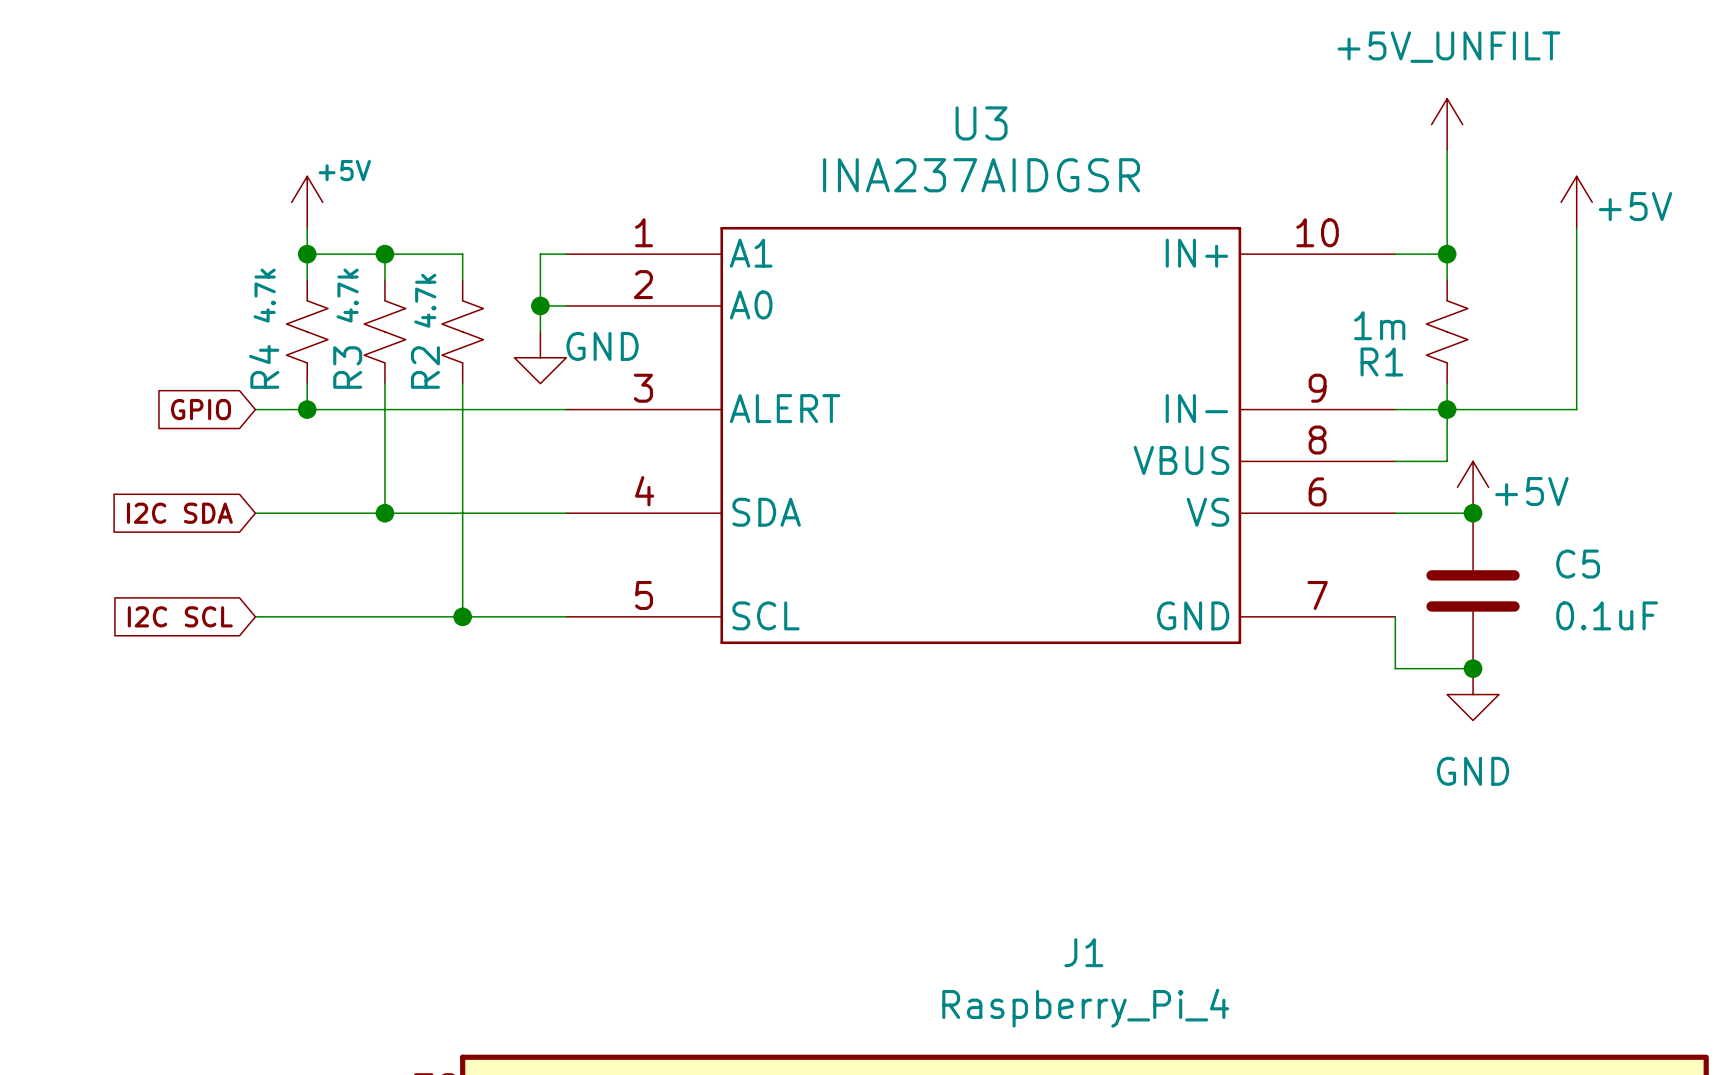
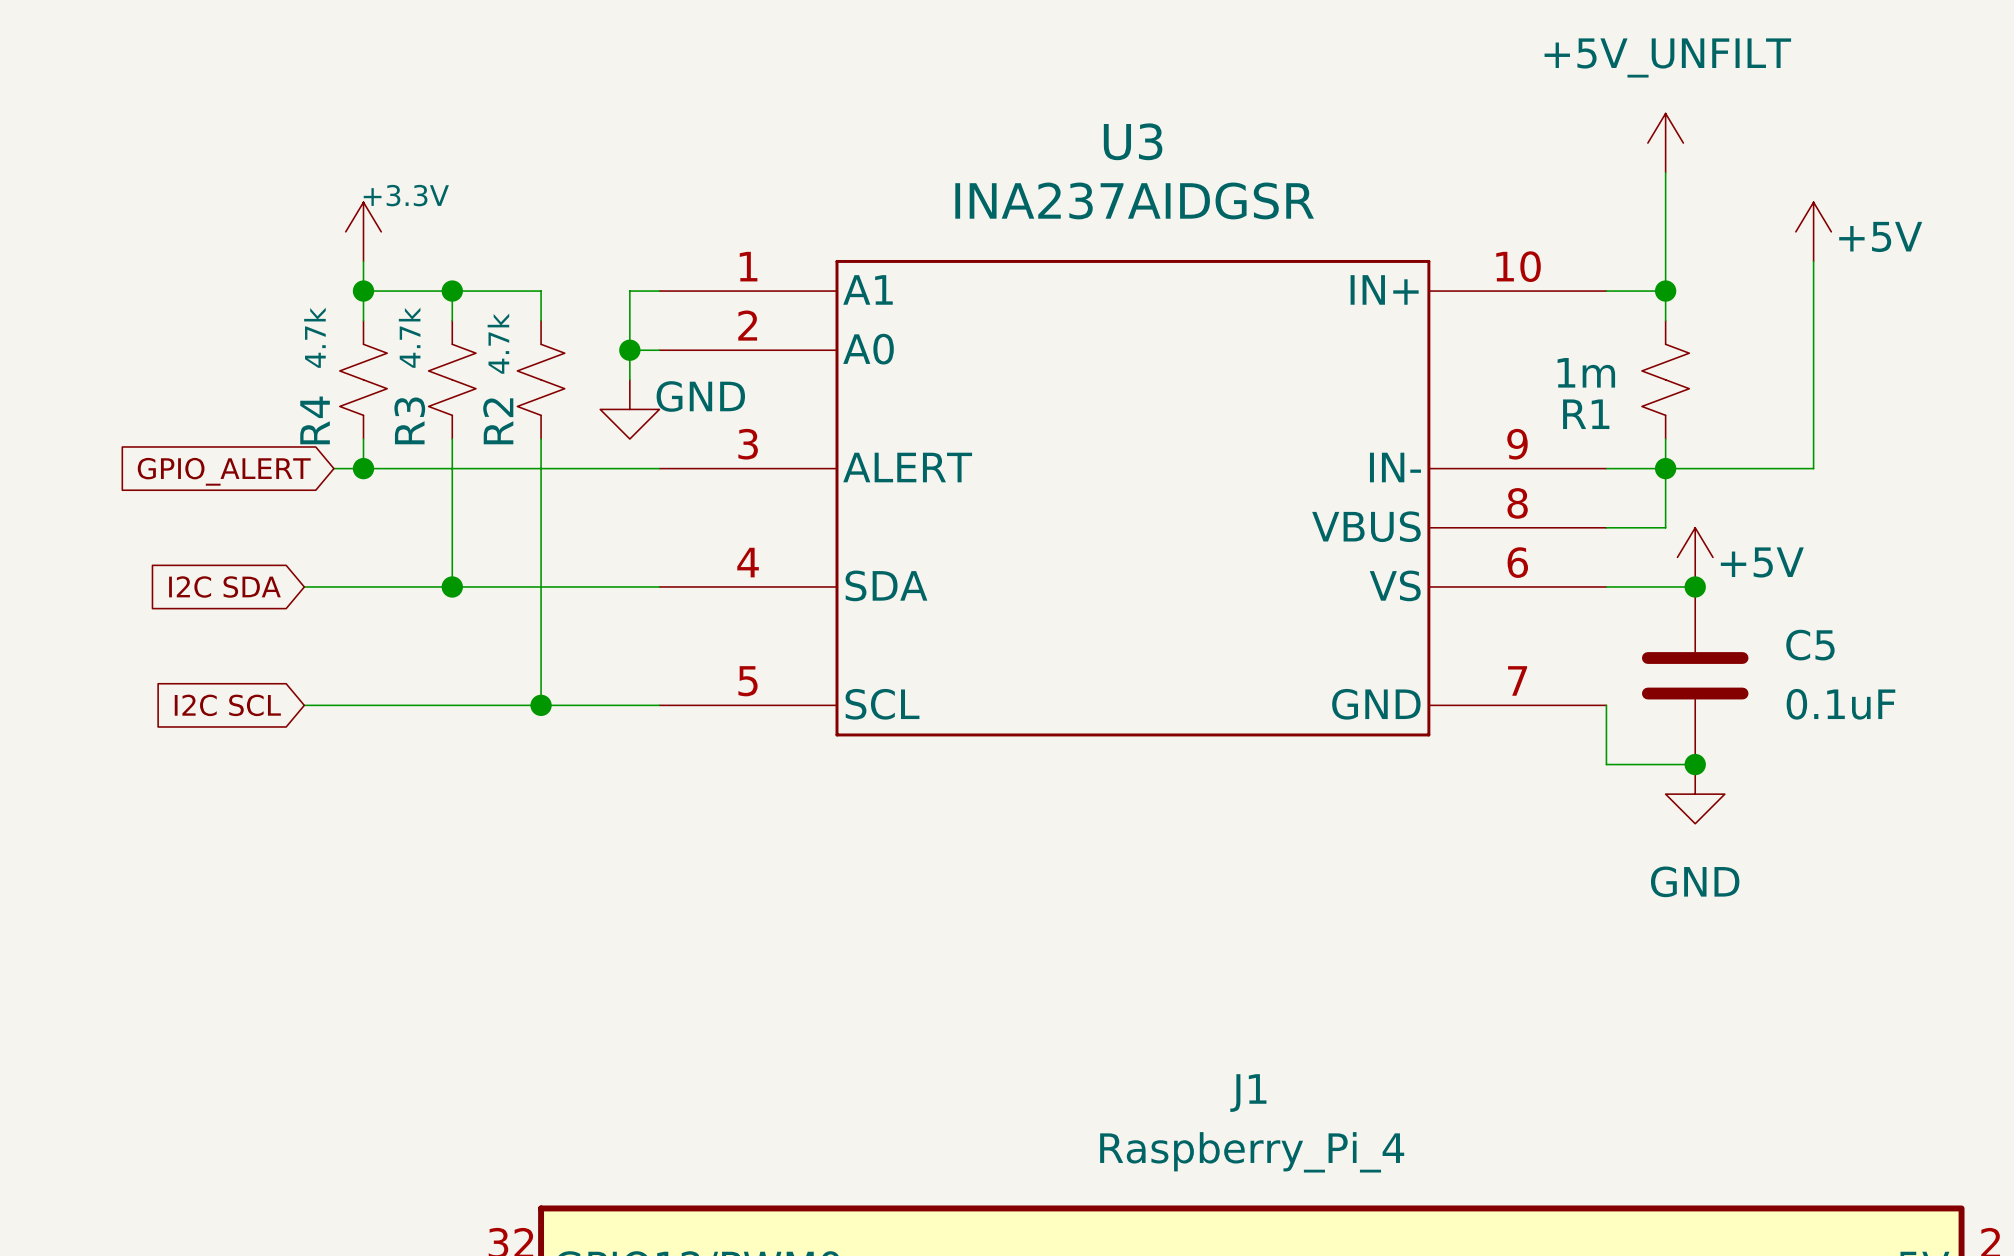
power symbol: +5V (307, 202) -> +3.3V (363, 231)
global label: GPIO (201, 409) -> none
wire: (255, 409) (281, 409) -> none
global label: none -> GPIO_ALERT (224, 471)

